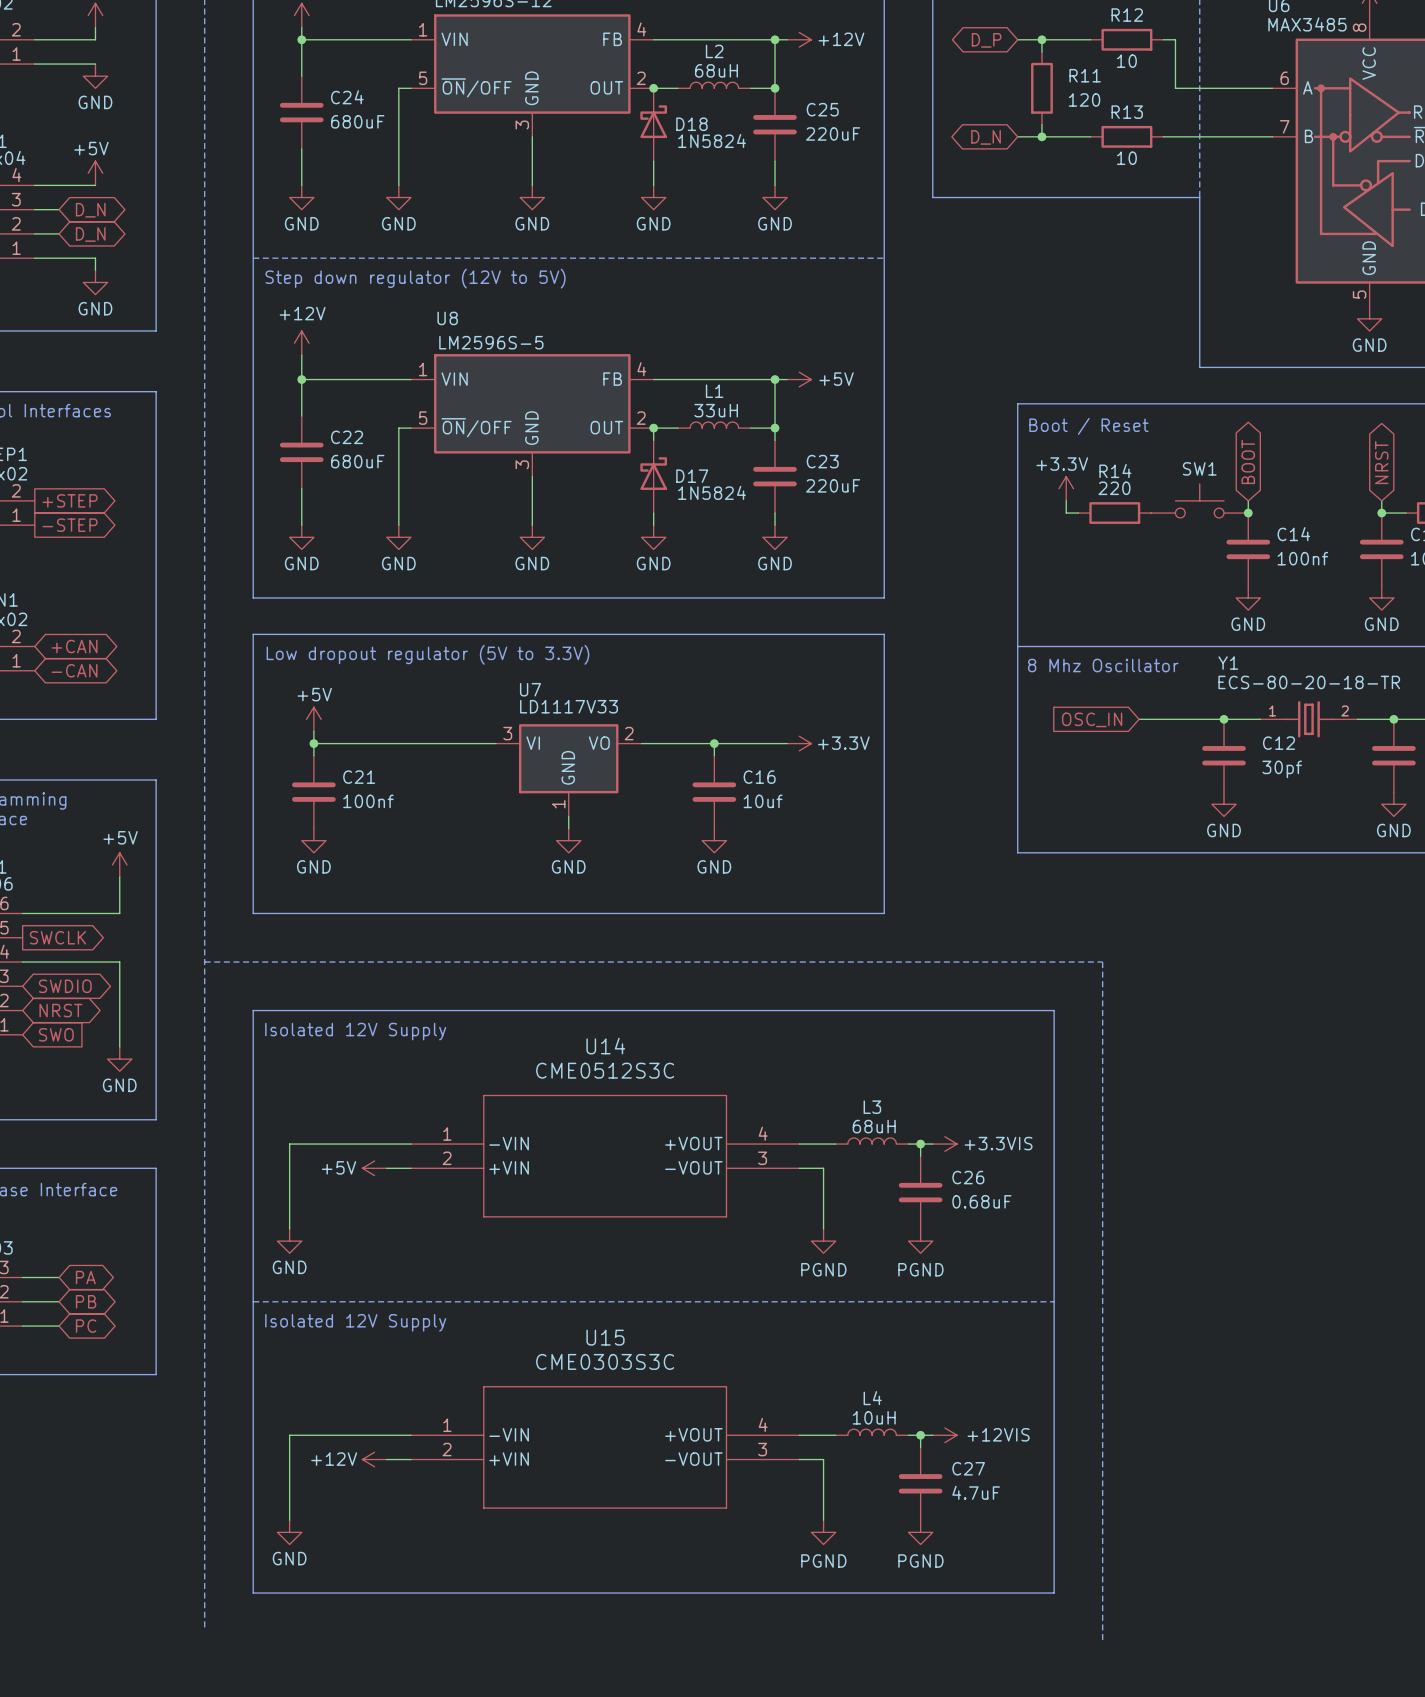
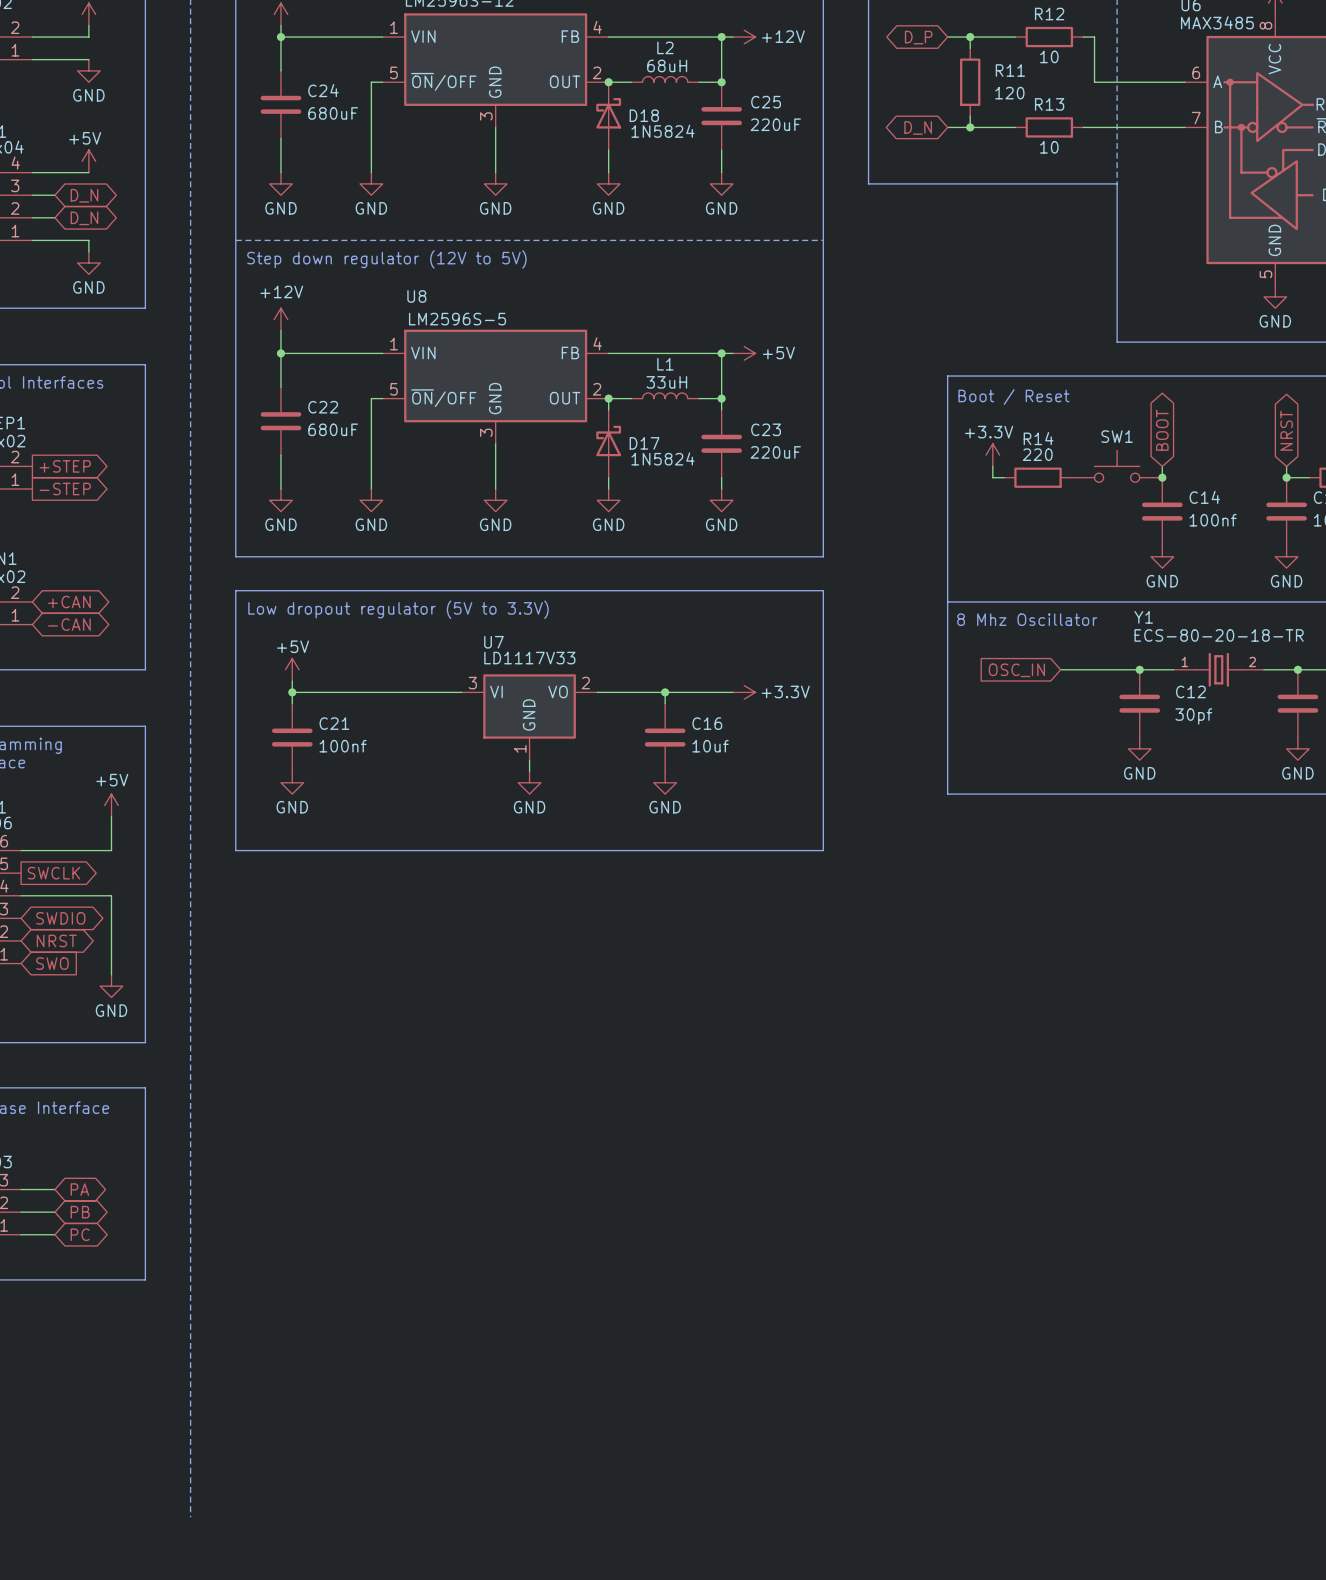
line: (204, 962) (1102, 962) (1102, 1641) -> none
line: (253, 1010) (1054, 1010) (1054, 1593) (253, 1593) (253, 1010) -> none
text: Isolated 12V Supply (355, 1031) -> none
L3: 68uH (872, 1141) -> none
wire: (410, 1144) (289, 1144) (289, 1228) -> none
wire: (799, 1144) (835, 1144) -> none
wire: (908, 1144) (932, 1144) -> none
wire: (920, 1144) (920, 1156) -> none
junction: (920, 1144) -> none
power symbol: +3.3VIS (944, 1144) -> none
U14: CME0512S3C (605, 1156) -> none
power symbol: +5V (374, 1168) -> none
wire: (386, 1168) (410, 1168) -> none
wire: (799, 1168) (823, 1168) (823, 1228) -> none
C26: 0.68uF (920, 1192) -> none
power symbol: GND (289, 1241) -> none
power symbol: PGND (823, 1241) -> none
power symbol: PGND (920, 1241) -> none
line: (253, 1301) (1054, 1301) -> none
text: Isolated 12V Supply (355, 1322) -> none
L4: 10uH (872, 1432) -> none
wire: (410, 1435) (289, 1435) (289, 1520) -> none
wire: (799, 1435) (835, 1435) -> none
wire: (908, 1435) (932, 1435) -> none
wire: (920, 1435) (920, 1447) -> none
junction: (920, 1435) -> none
power symbol: +12VIS (944, 1435) -> none
U15: CME0303S3C (605, 1447) -> none
power symbol: +12V (374, 1459) -> none
wire: (386, 1459) (410, 1459) -> none
wire: (799, 1459) (823, 1459) (823, 1520) -> none
C27: 4.7uF (920, 1483) -> none
power symbol: GND (289, 1532) -> none
power symbol: PGND (823, 1532) -> none
power symbol: PGND (920, 1532) -> none

